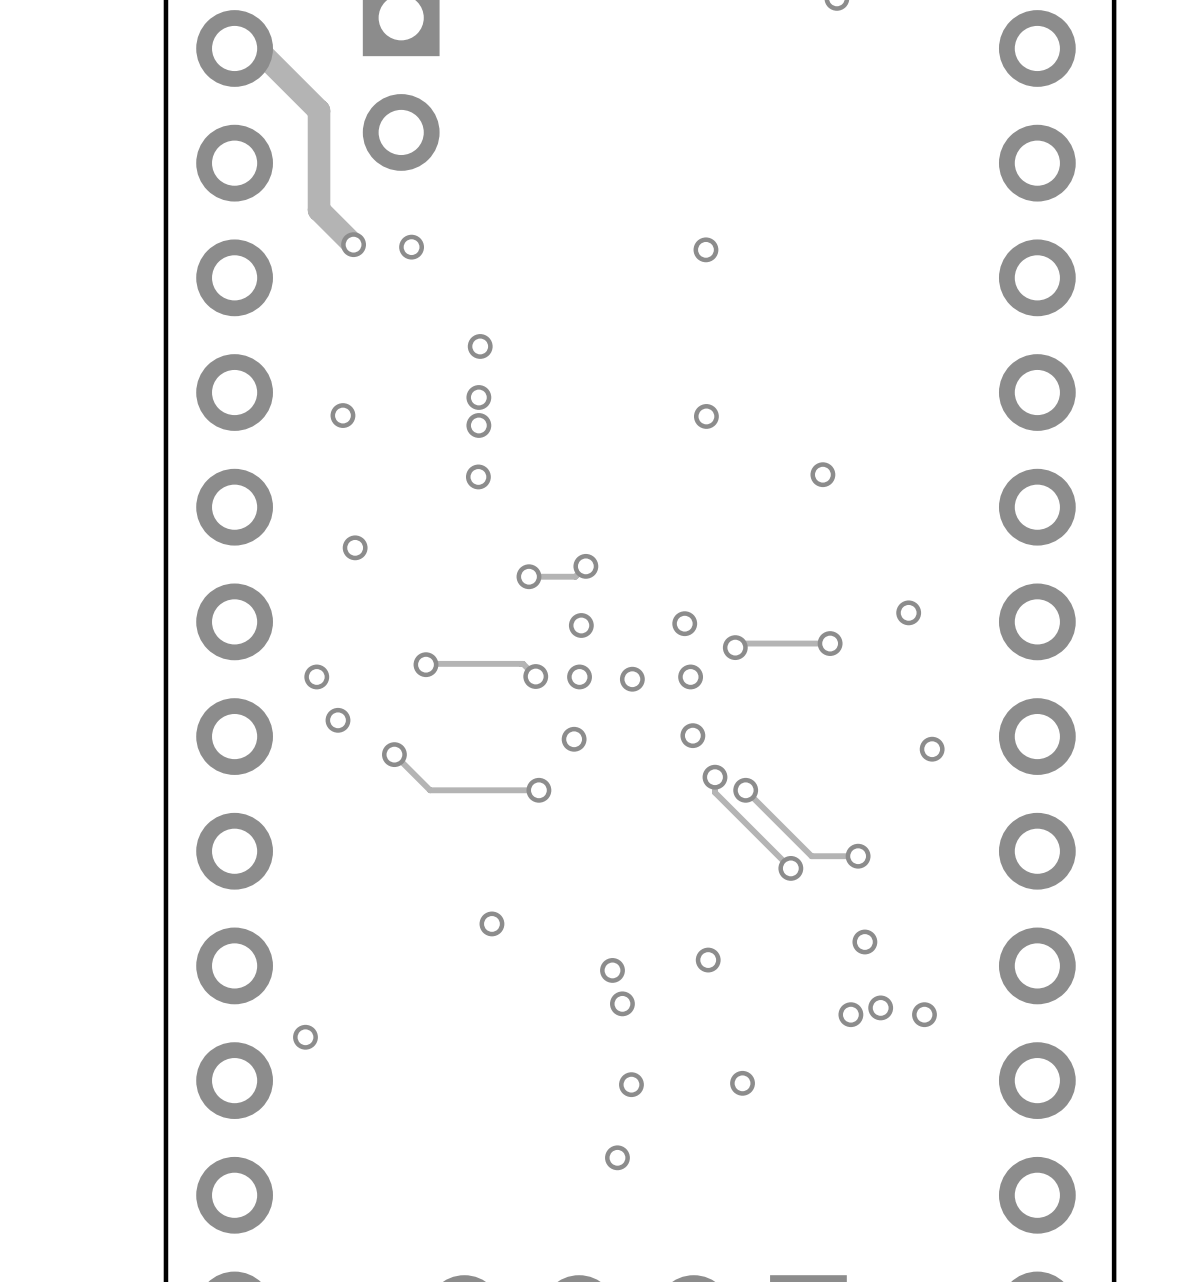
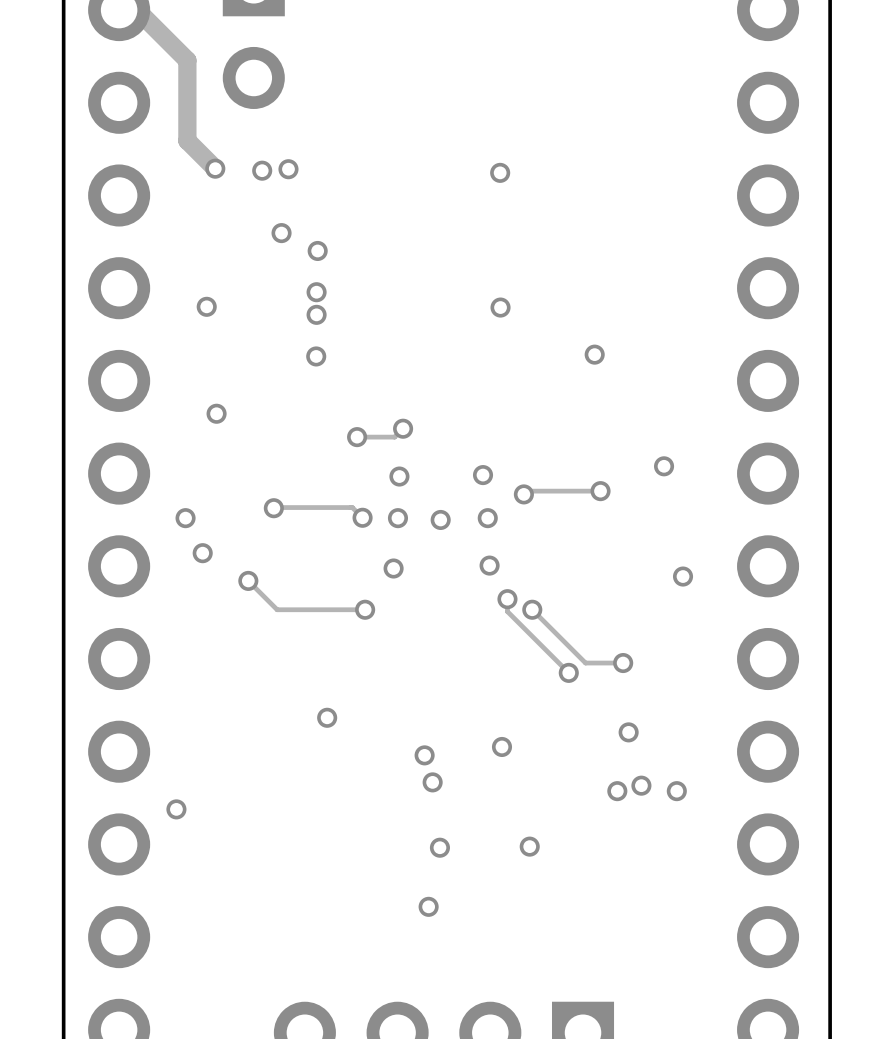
via: none -> (288, 169)
via: none -> (281, 233)

